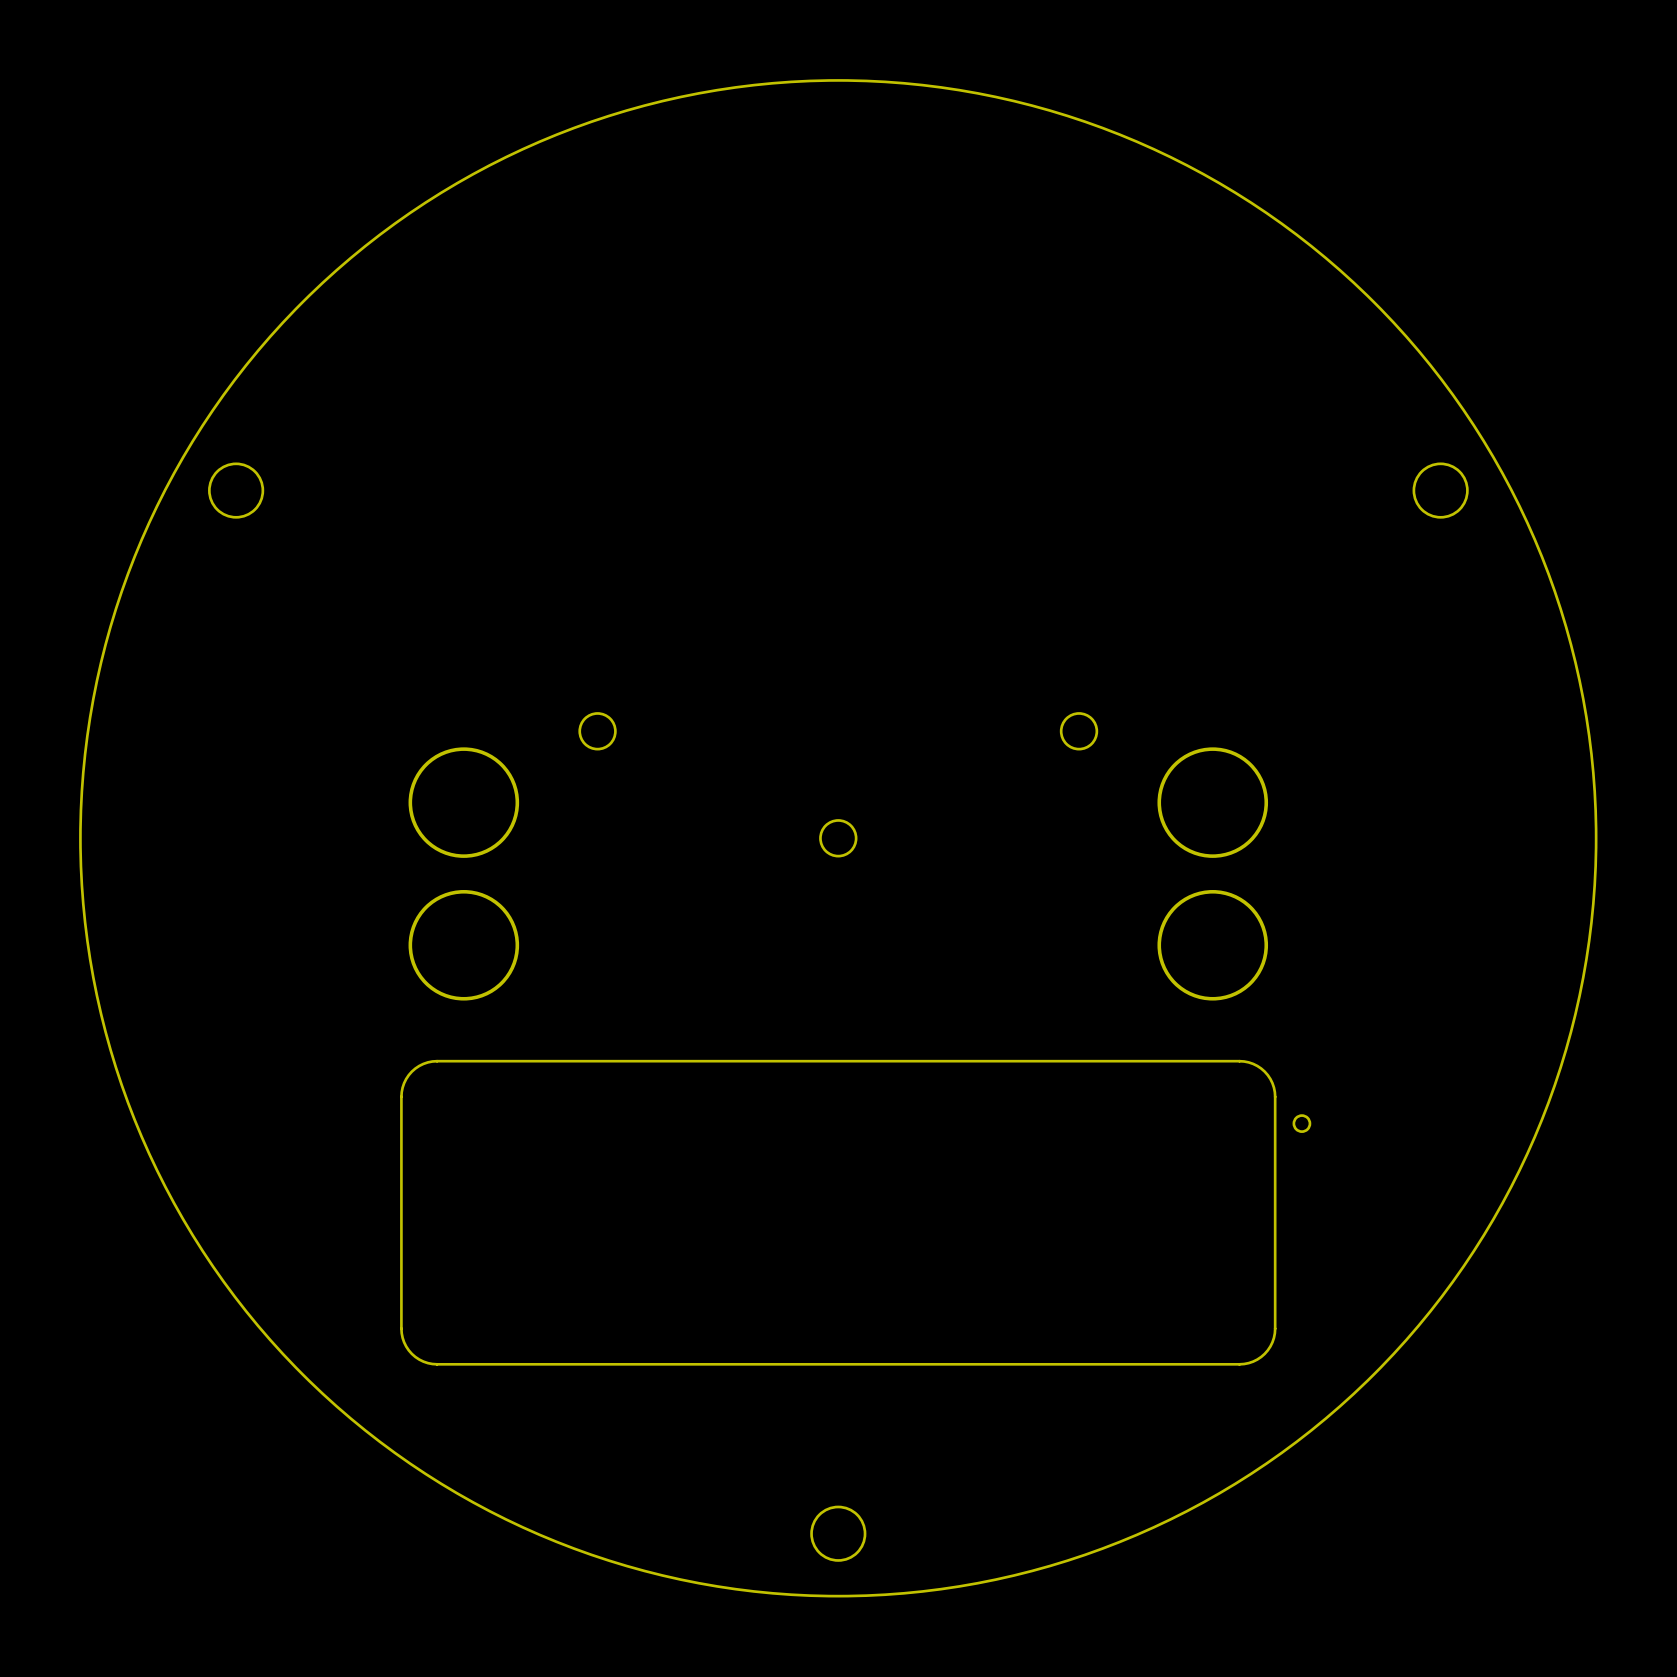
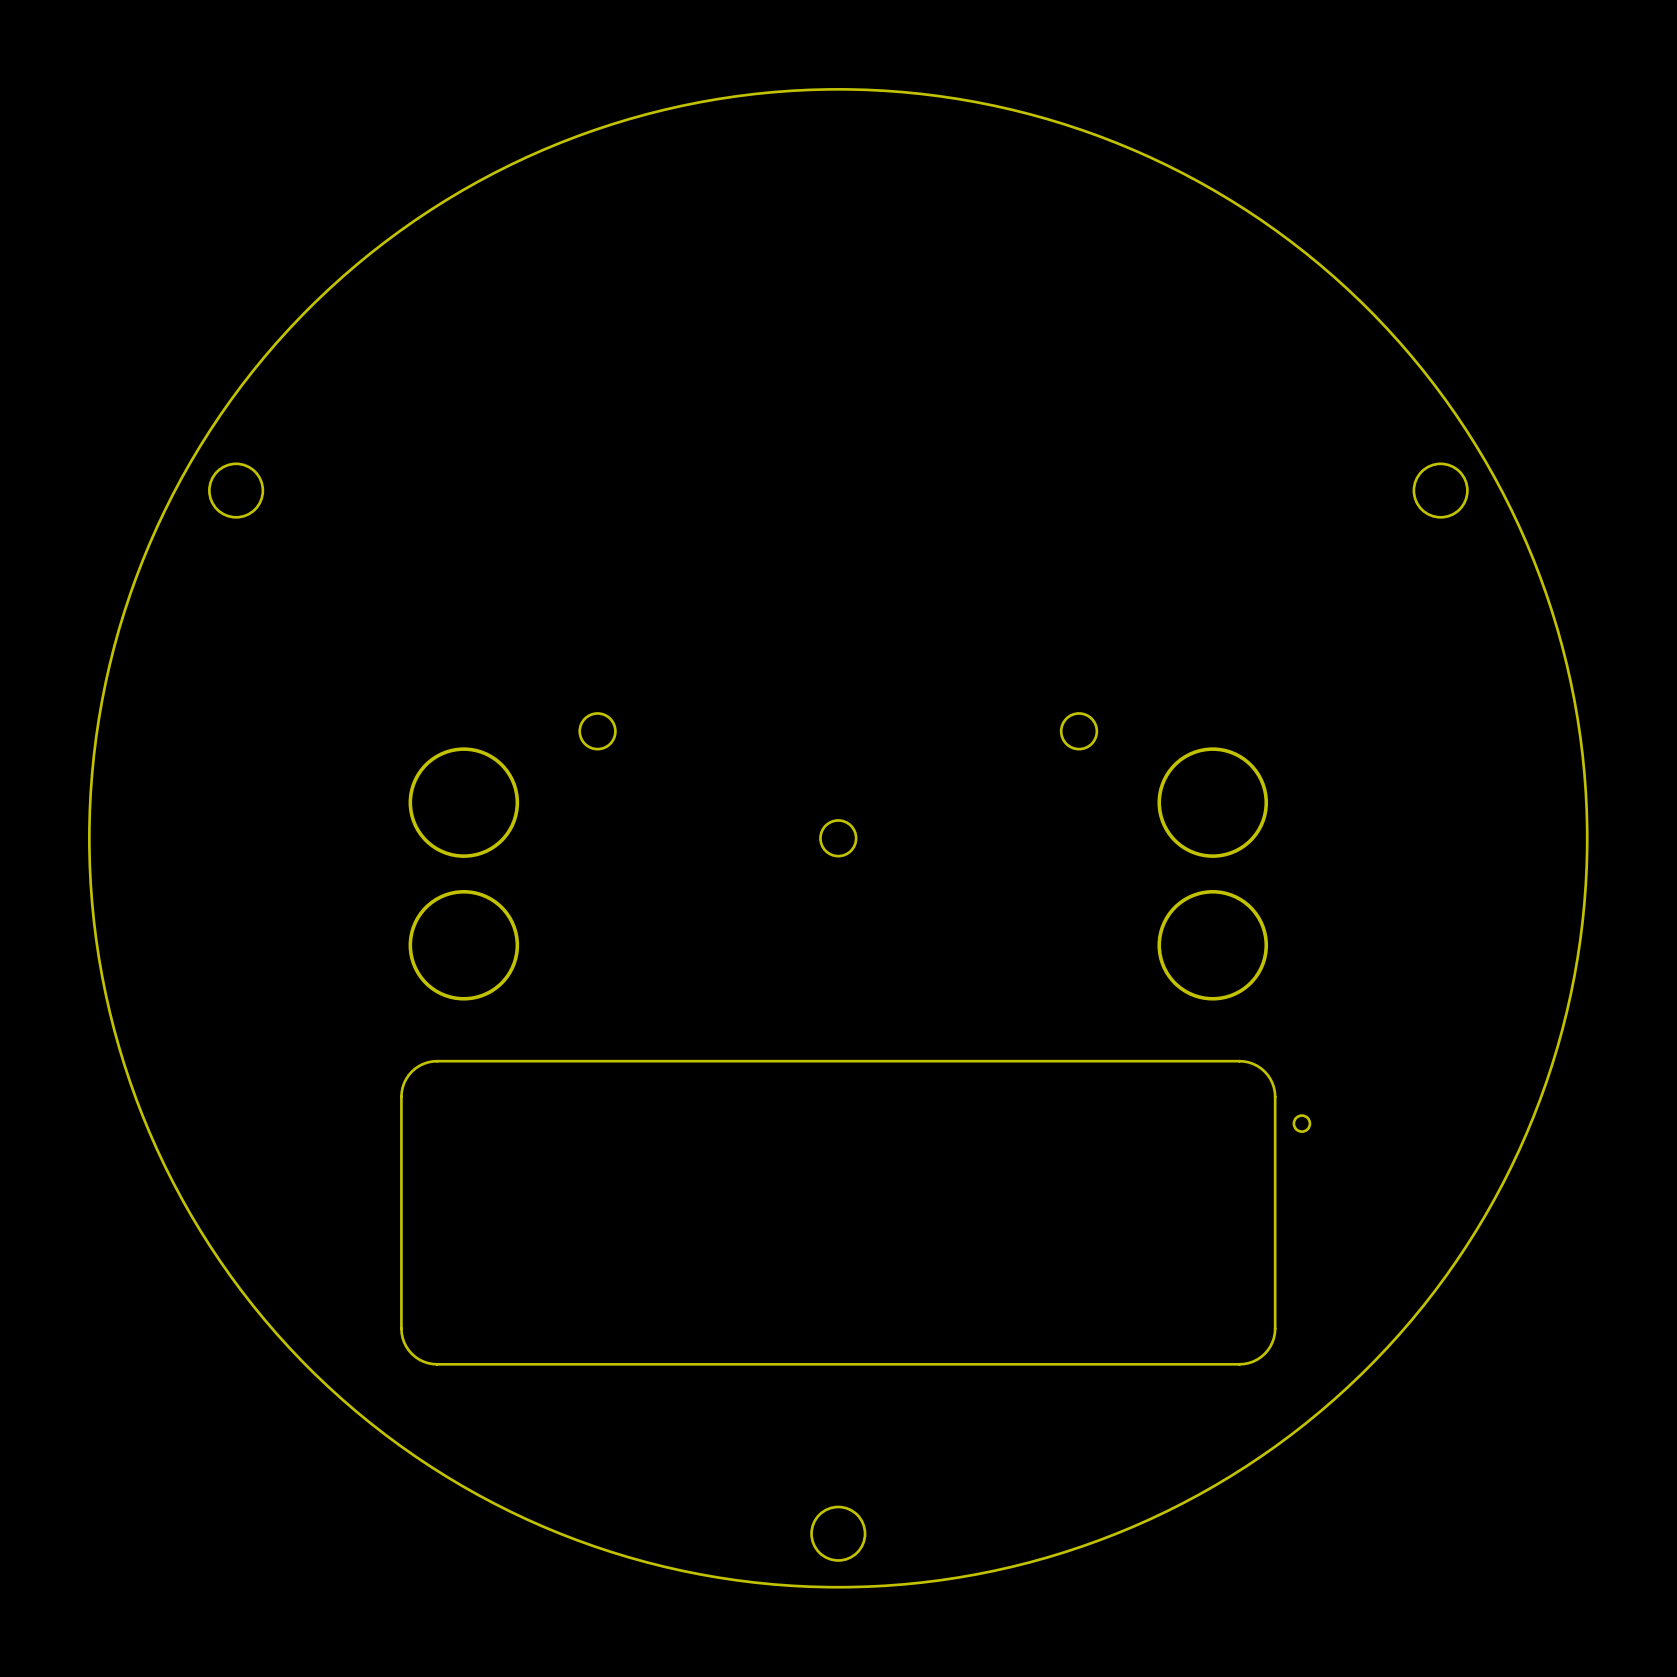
round board edge size: [79, 79, 1598, 1598] -> [88, 88, 1589, 1589]

